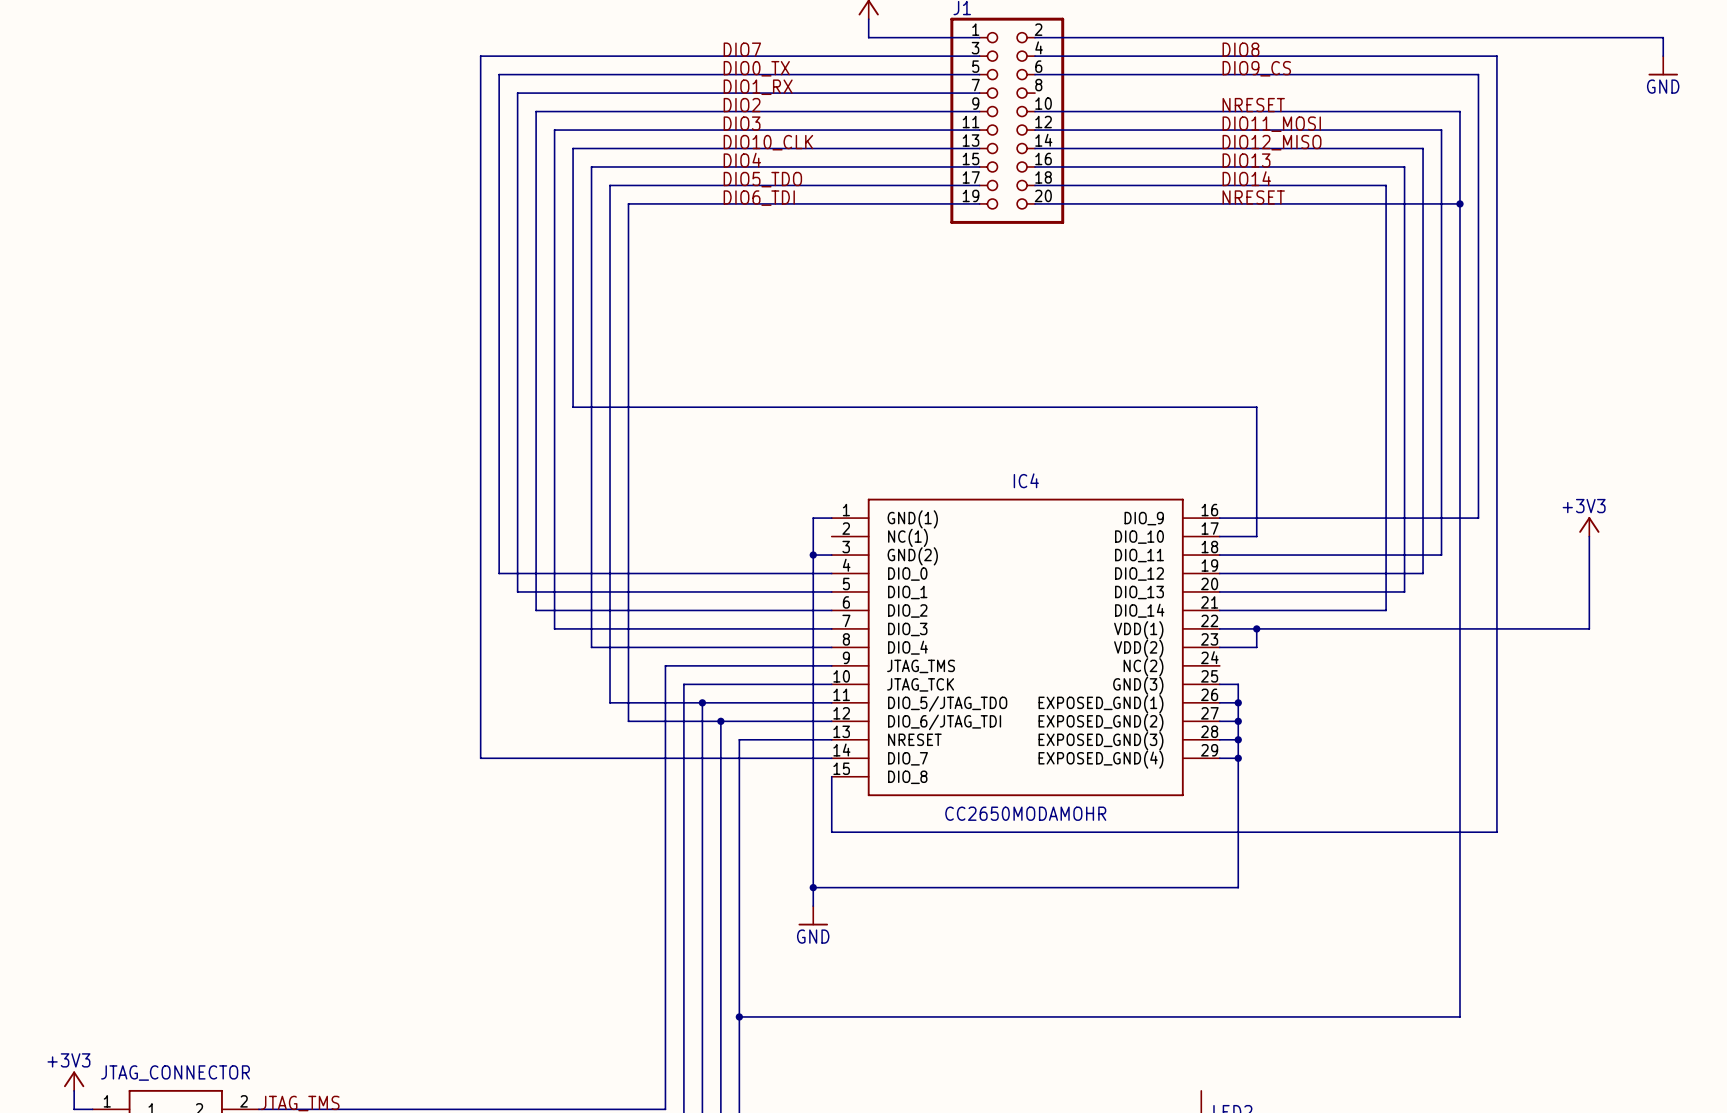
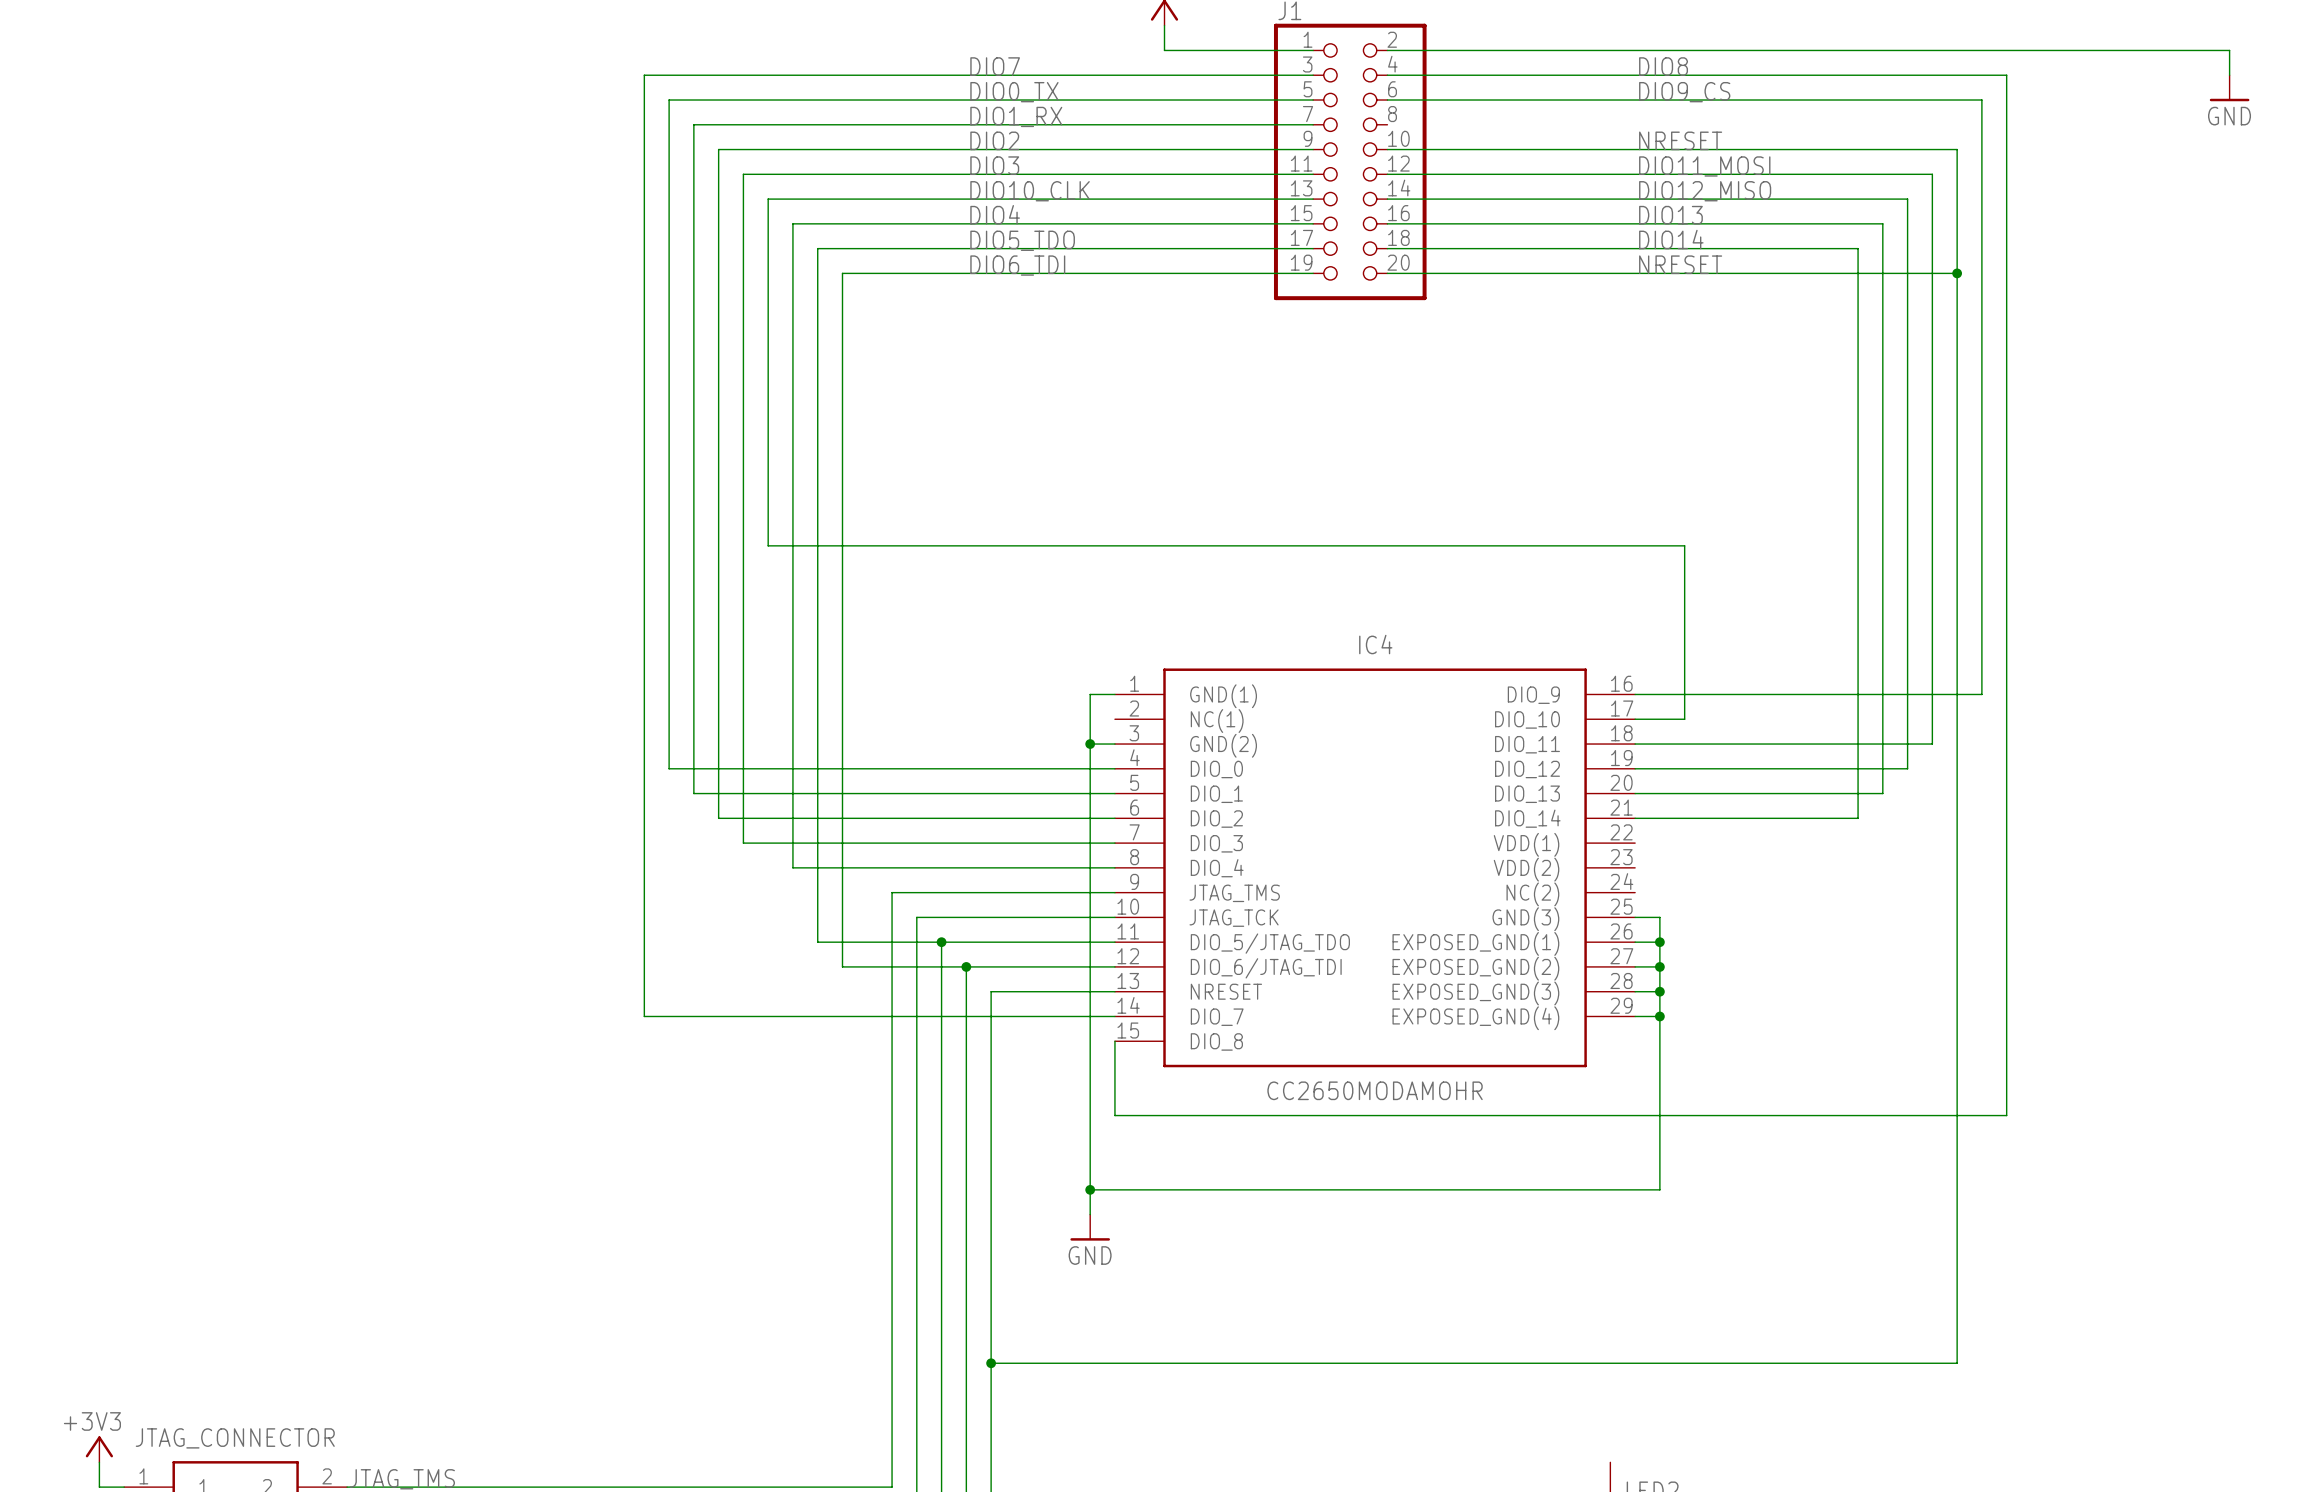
power symbol: +3V3 (1589, 526) -> none
wire: (1589, 536) (1589, 628) (1219, 628) -> none
wire: (1256, 628) (1256, 647) (1219, 647) -> none
junction: (1256, 628) -> none

